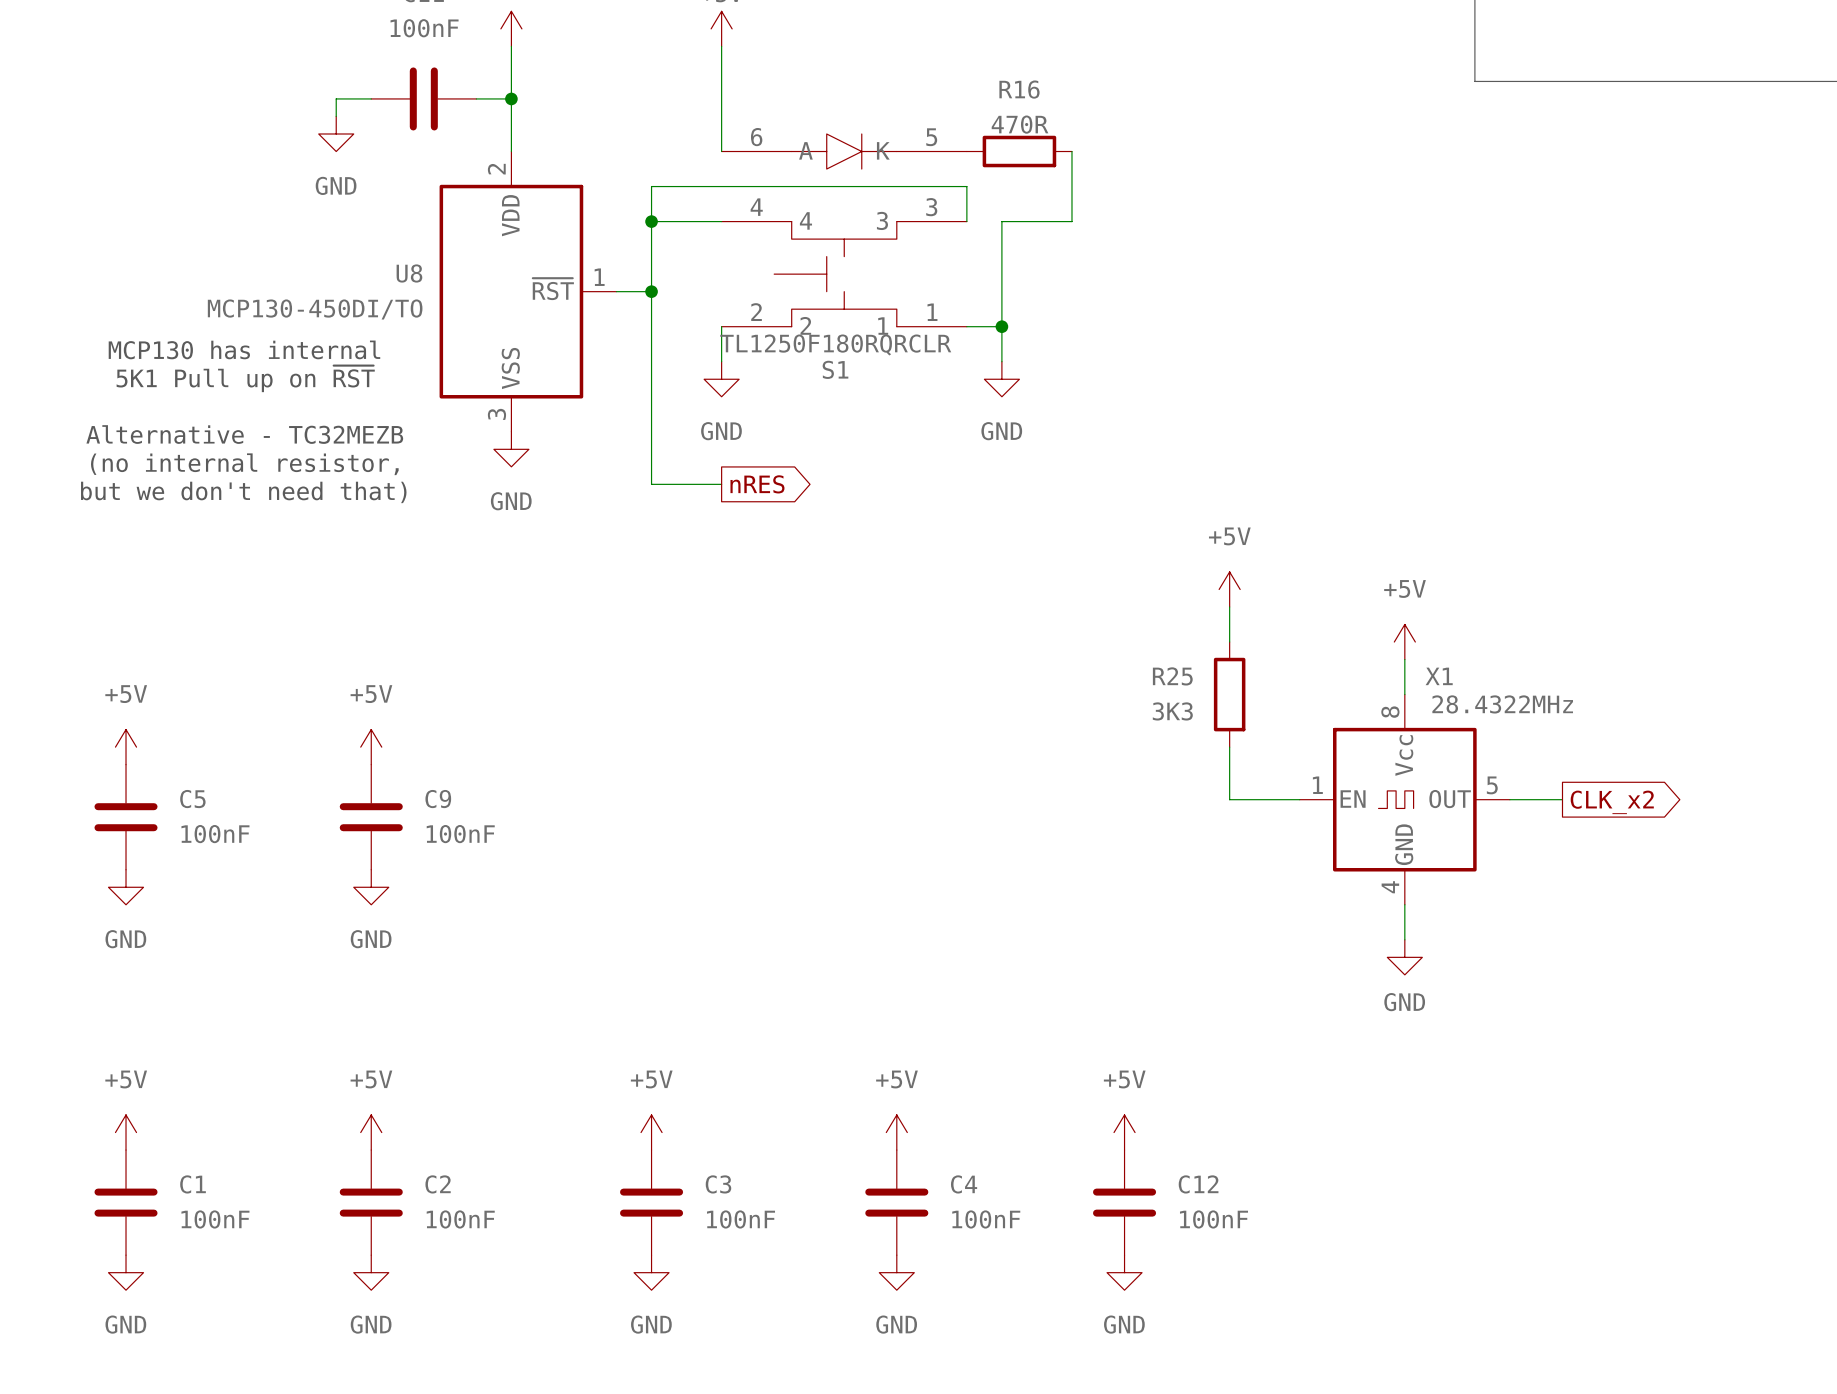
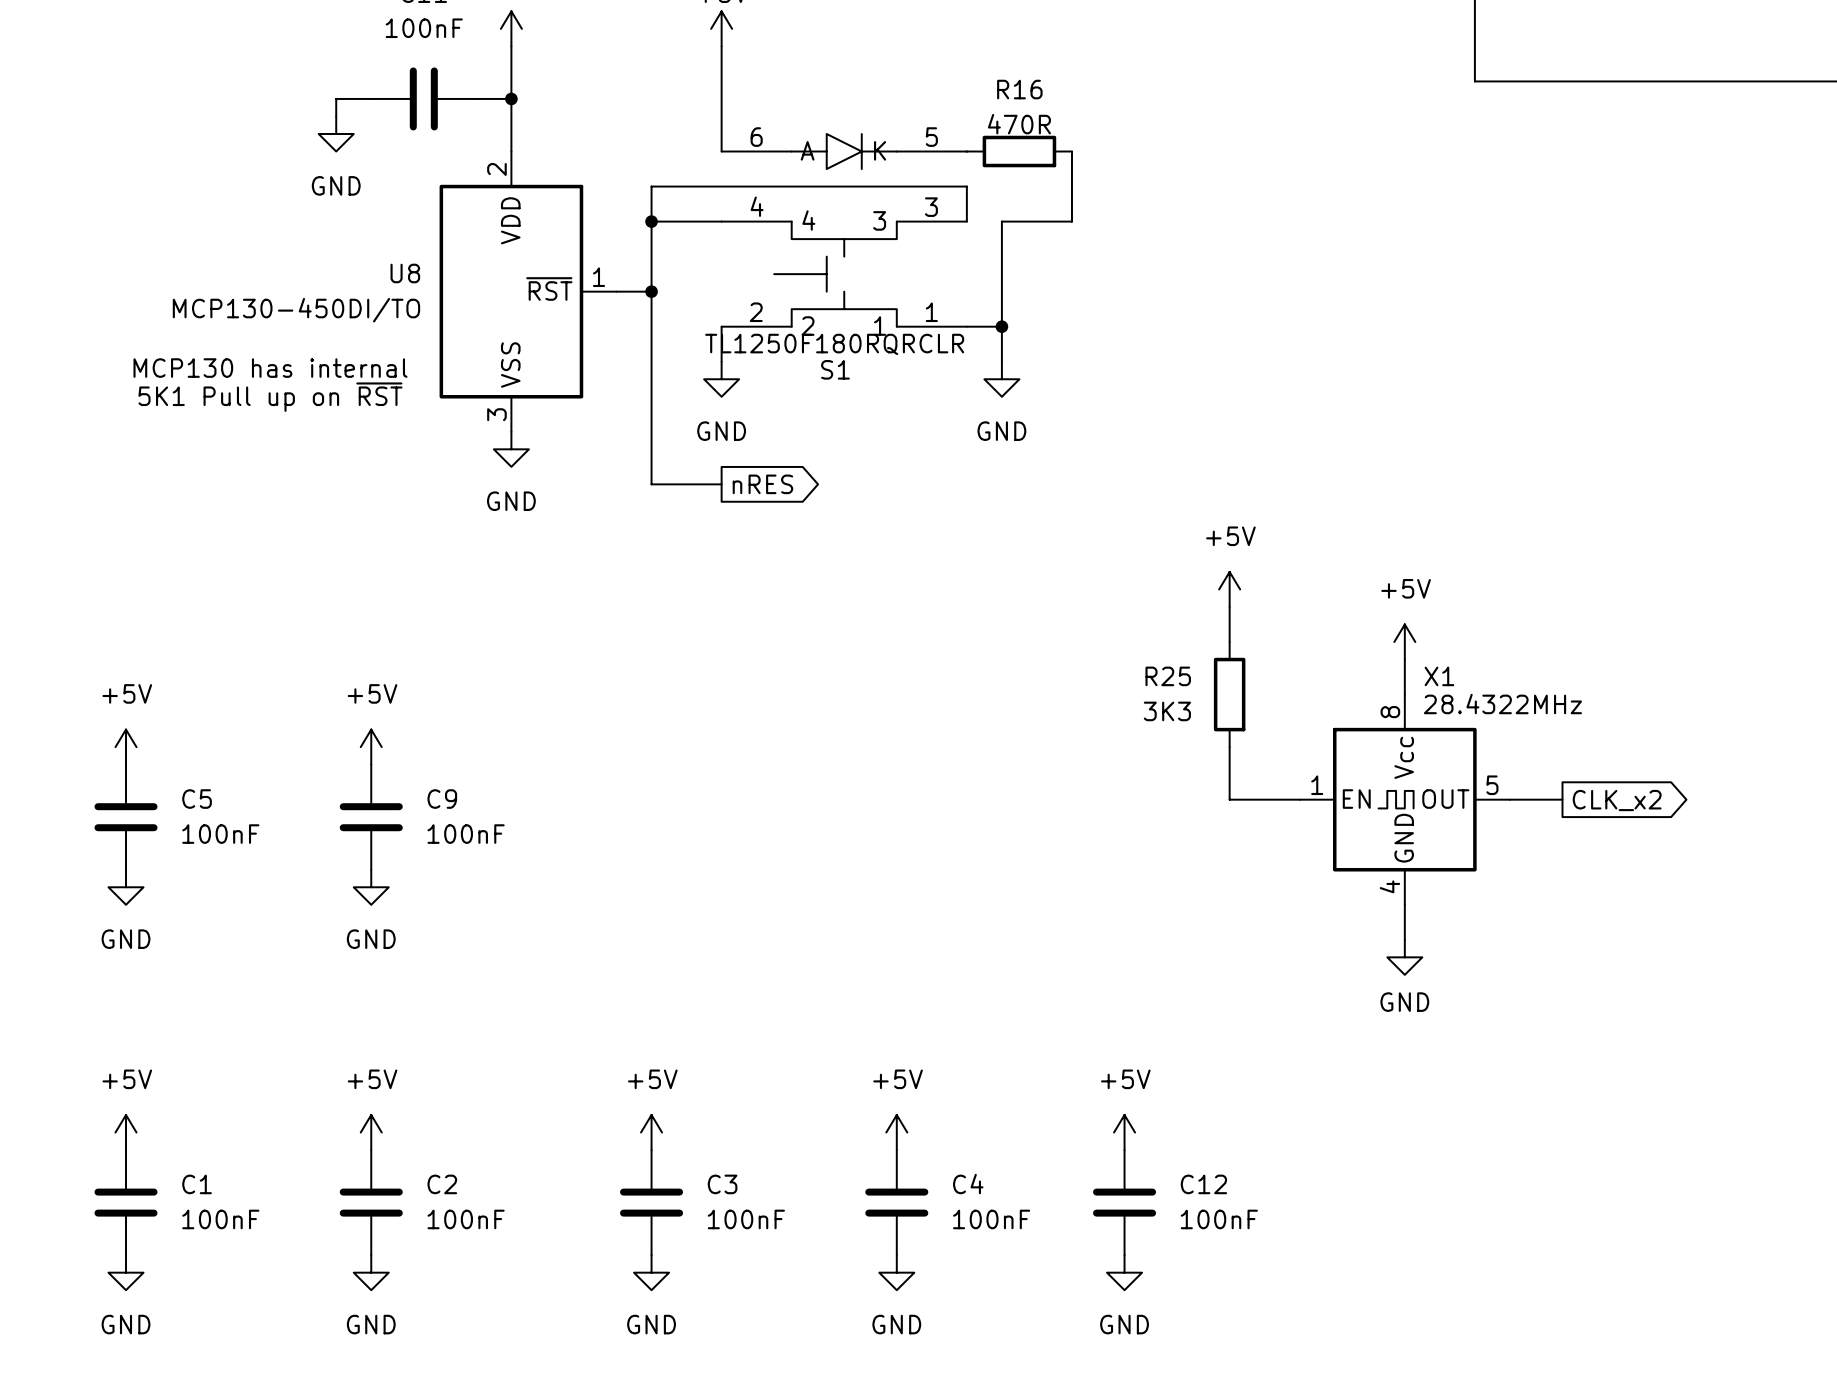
text position: MCP130 has internal (244, 349) -> MCP130 has internal (270, 368)
text position: 5K1 Pull up on ~{RST} (245, 378) -> 5K1 Pull up on ~{RST} (270, 397)
text: Alternative - TC32MEZB (244, 434) -> none
text: (no internal resistor, (244, 464) -> none
text: but we don't need that) (243, 492) -> none

